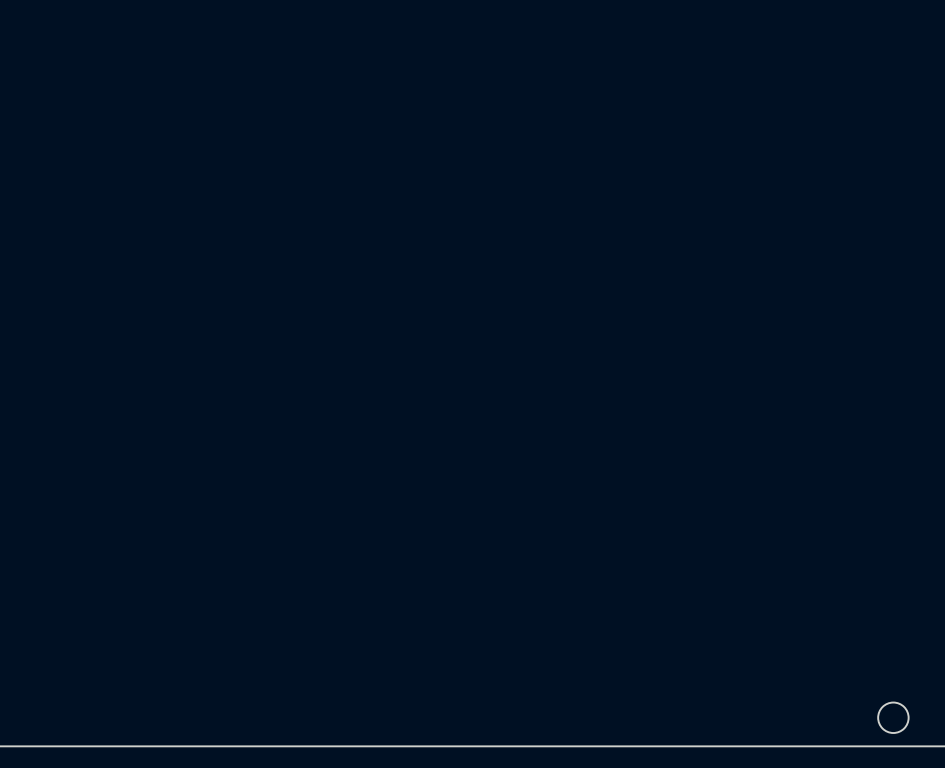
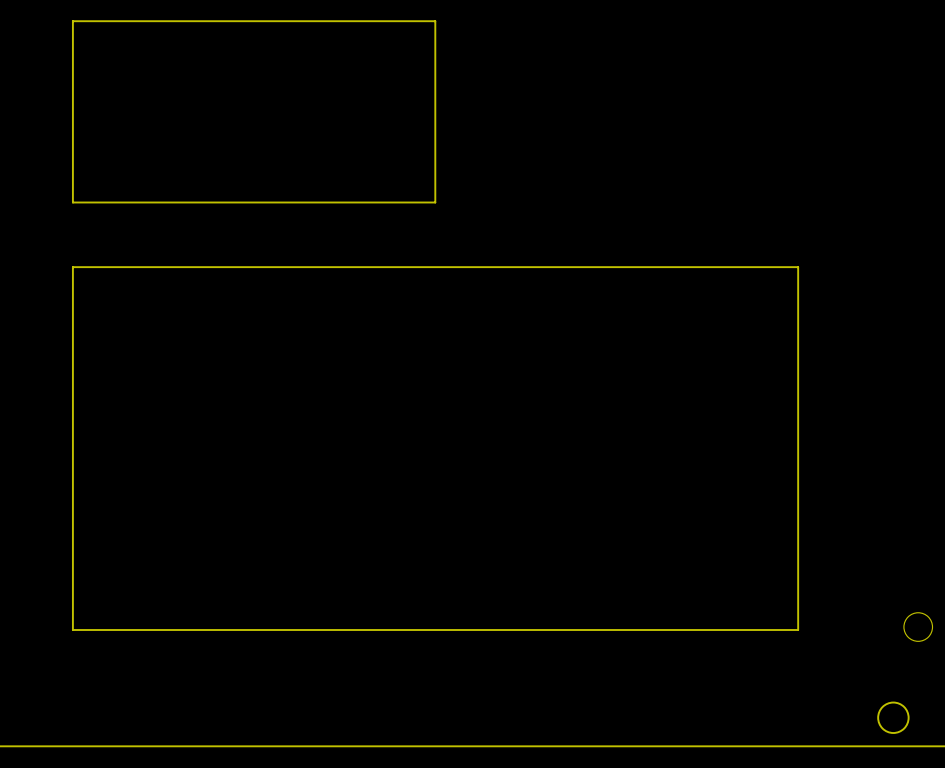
board edge: none -> (72, 21) (435, 21) (435, 202) (72, 202) (72, 21)
board edge: none -> (72, 267) (72, 629) (798, 629) (798, 267) (72, 267)
round board edge: none -> [903, 612, 933, 642]

